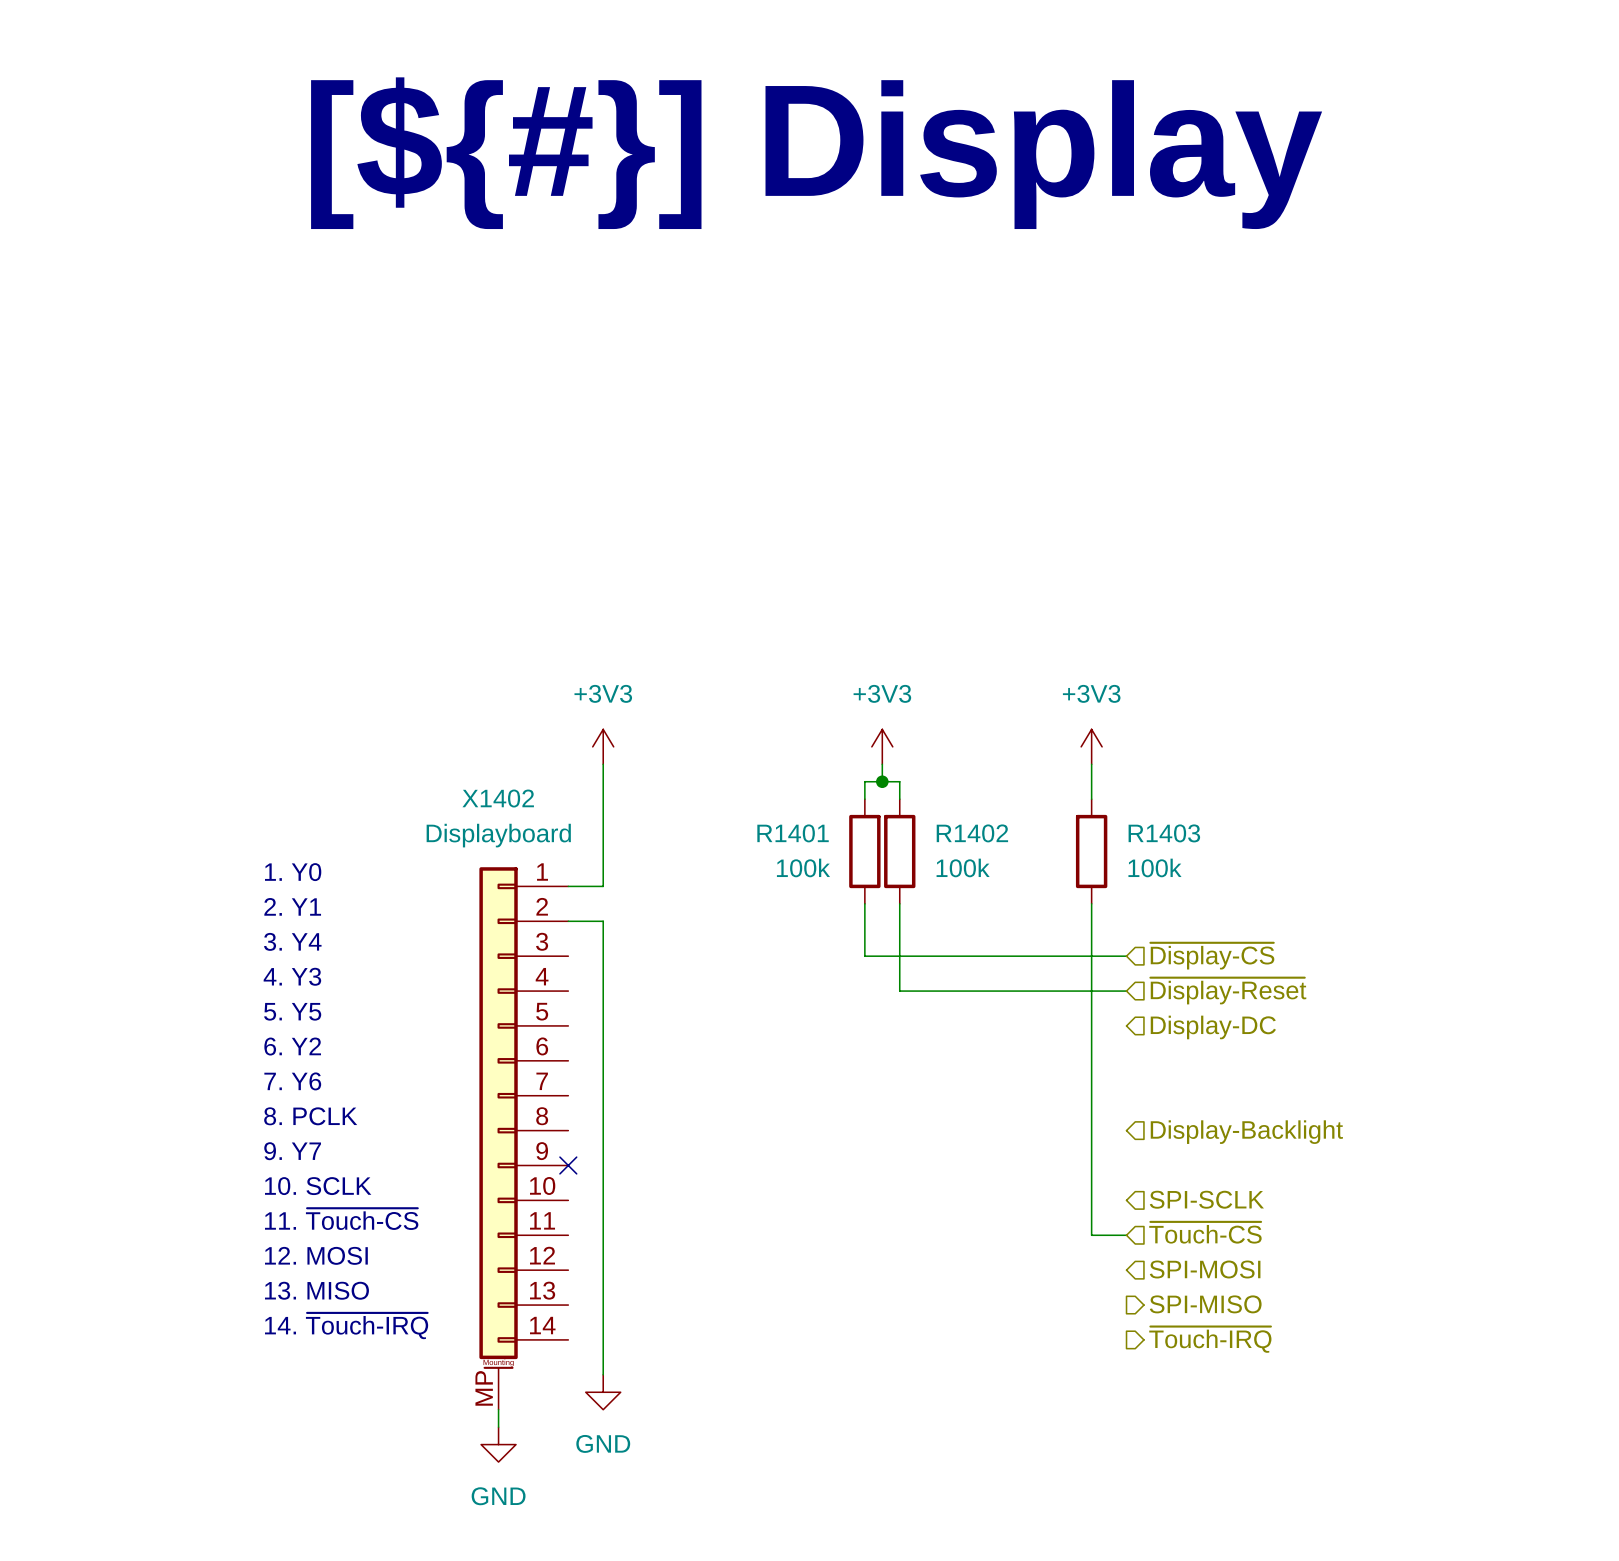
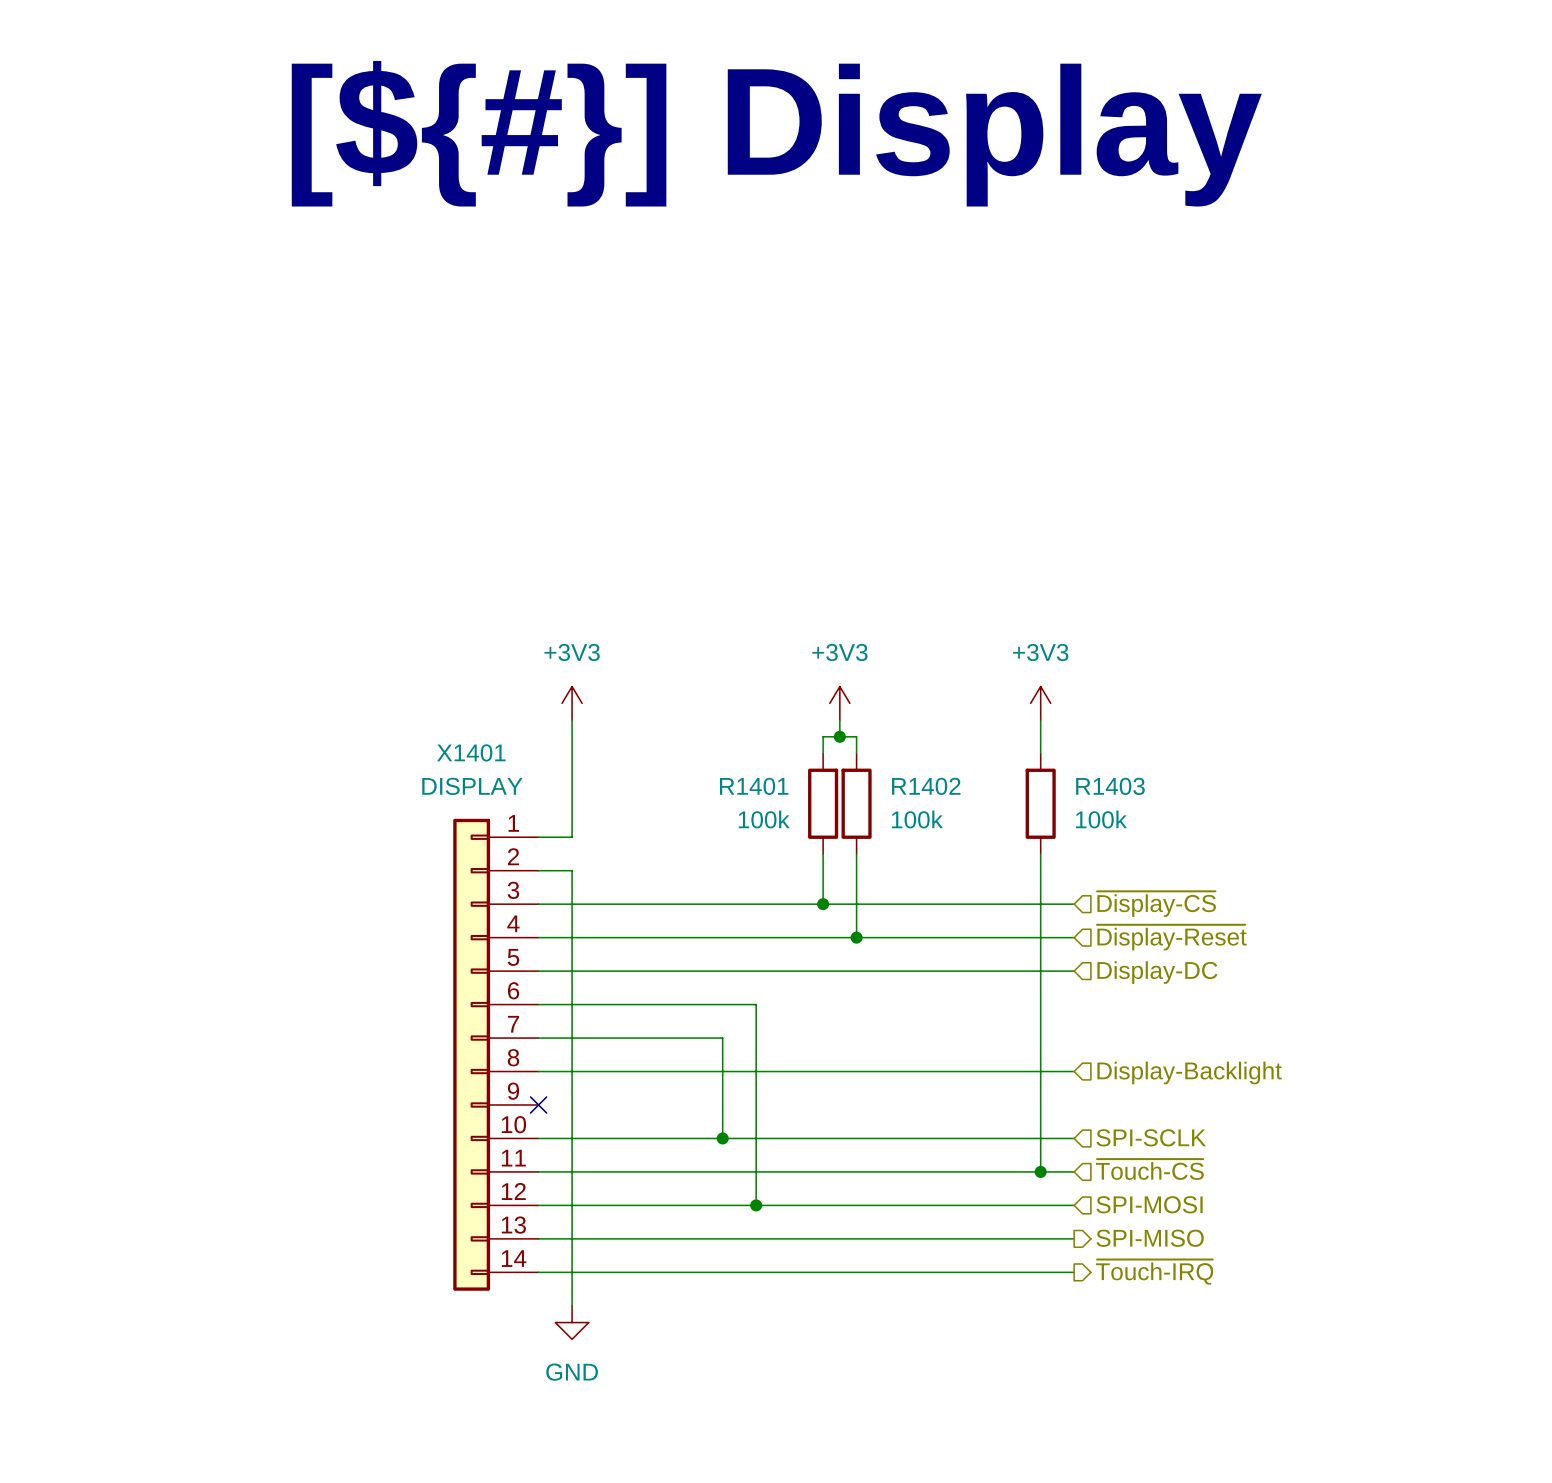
text: 1. Y0 (293, 872) -> none
text: 2. Y1 (292, 906) -> none
text: 3. Y4 (292, 941) -> none
wire: none -> (538, 904) (823, 904)
junction: none -> (823, 904)
text: 4. Y3 (292, 976) -> none
wire: none -> (538, 937) (856, 937)
junction: none -> (856, 937)
text: 5. Y5 (292, 1011) -> none
wire: none -> (538, 971) (1074, 971)
text: 6. Y2 (292, 1046) -> none
wire: none -> (538, 1004) (756, 1004) (756, 1205)
text: 7. Y6 (292, 1081) -> none
wire: none -> (538, 1038) (722, 1038) (722, 1138)
X1401: none -> DISPLAY (495, 1054)
text: 8. PCLK (310, 1116) -> none
wire: none -> (538, 1071) (1074, 1071)
X1402: Displayboard (523, 1138) -> none
text: 9. Y7 (292, 1151) -> none
text: 10. SCLK (318, 1186) -> none
wire: none -> (538, 1138) (1074, 1138)
junction: none -> (722, 1138)
text: 11. ~{Touch-CS} (341, 1219) -> none
wire: none -> (538, 1171) (1040, 1171)
junction: none -> (1040, 1171)
text: 12. MOSI (316, 1255) -> none
wire: none -> (538, 1205) (1074, 1205)
junction: none -> (756, 1205)
text: 13. MISO (316, 1290) -> none
wire: none -> (538, 1238) (1074, 1238)
text: 14. ~{Touch-IRQ} (346, 1326) -> none
wire: none -> (538, 1272) (1074, 1272)
wire: (498, 1409) (498, 1427) -> none
power symbol: GND (498, 1444) -> none

